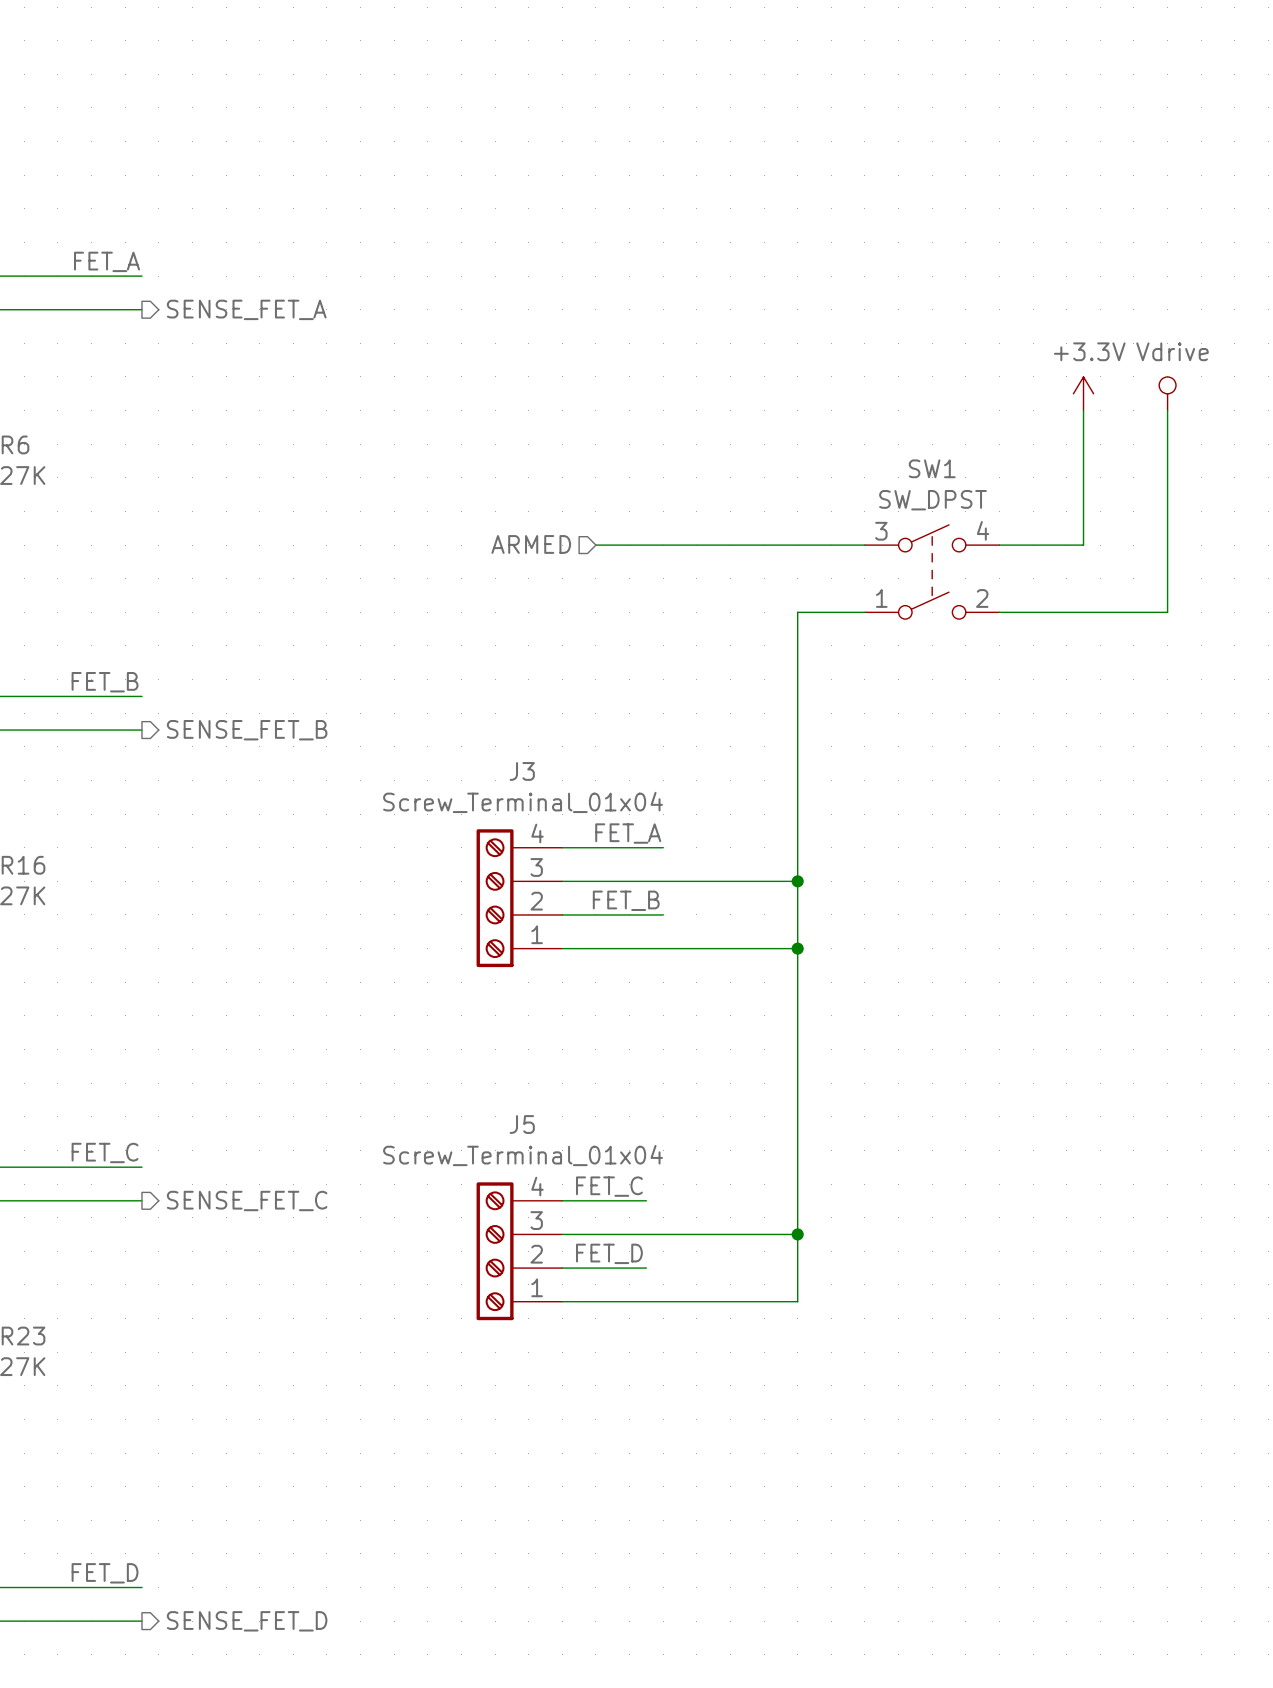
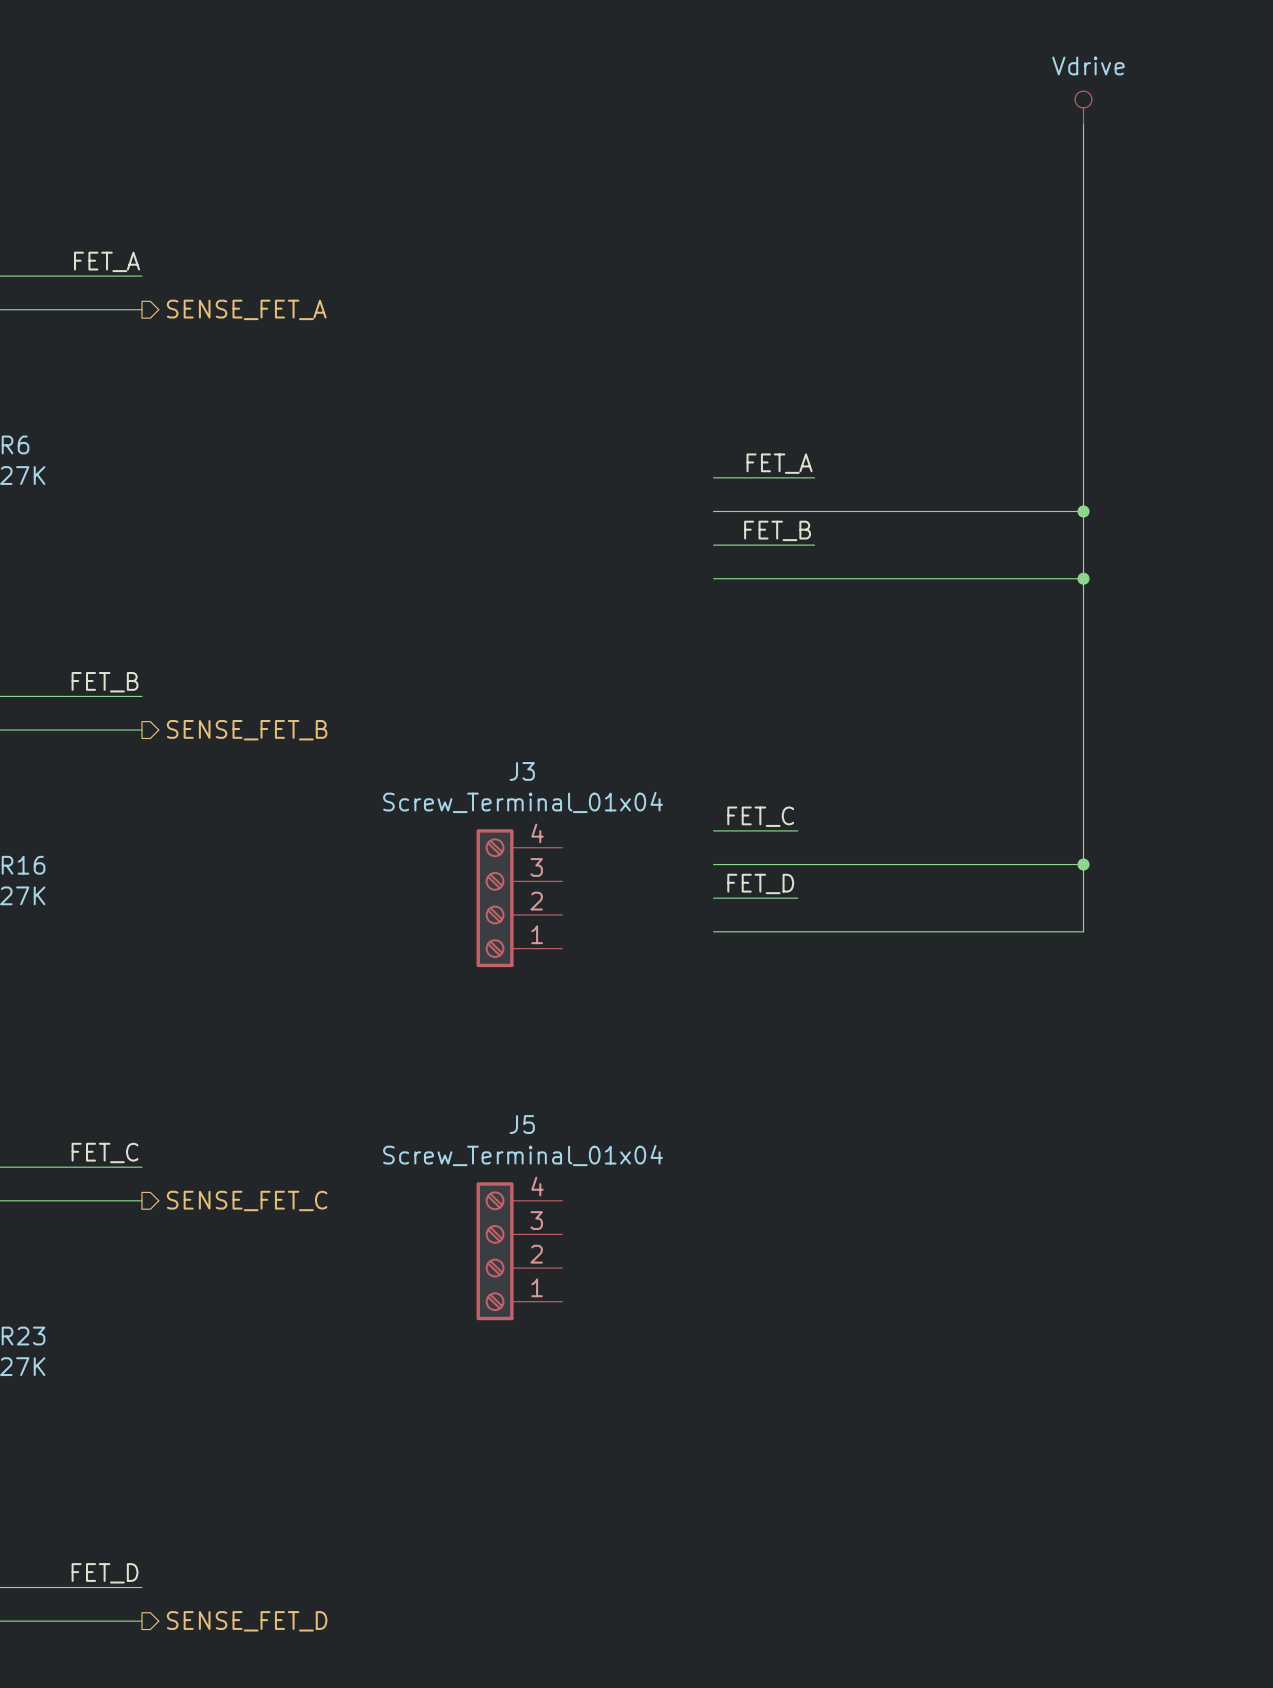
wire: none -> (1083, 124) (1083, 410)
power symbol: +3.3V (1083, 393) -> none
power symbol position: Vdrive (1167, 393) -> Vdrive (1083, 107)
wire: (1167, 410) (1167, 612) (999, 612) -> none
label: none -> FET_A (779, 463)
wire: none -> (713, 477) (814, 477)
wire: none -> (713, 511) (1083, 511)
junction: none -> (1083, 511)
label: none -> FET_B (777, 530)
hierarchical label: ARMED (531, 544) -> none
wire: (595, 545) (713, 545) -> none
wire: (814, 545) (864, 545) -> none
wire: (999, 545) (1083, 545) -> (713, 931) (1083, 931) (1083, 545)
SW1: SW_DPST (932, 572) -> none
wire: none -> (713, 578) (1083, 578)
junction: none -> (1083, 578)
wire: (864, 612) (797, 612) (797, 1301) (562, 1301) -> none
label: none -> FET_C (760, 816)
wire: none -> (713, 830) (797, 830)
label: FET_A (628, 833) -> none
wire: (562, 847) (663, 847) -> none
wire: none -> (713, 864) (1083, 864)
junction: none -> (1083, 864)
wire: (562, 881) (797, 881) -> none
junction: (797, 881) -> none
label: none -> FET_D (760, 883)
wire: none -> (713, 898) (797, 898)
label: FET_B (626, 900) -> none
wire: (562, 914) (663, 914) -> none
wire: (562, 948) (797, 948) -> none
junction: (797, 948) -> none
label: FET_C (609, 1186) -> none
wire: (562, 1200) (646, 1200) -> none
wire: (562, 1234) (797, 1234) -> none
junction: (797, 1234) -> none
label: FET_D (609, 1253) -> none
wire: (562, 1268) (646, 1268) -> none

